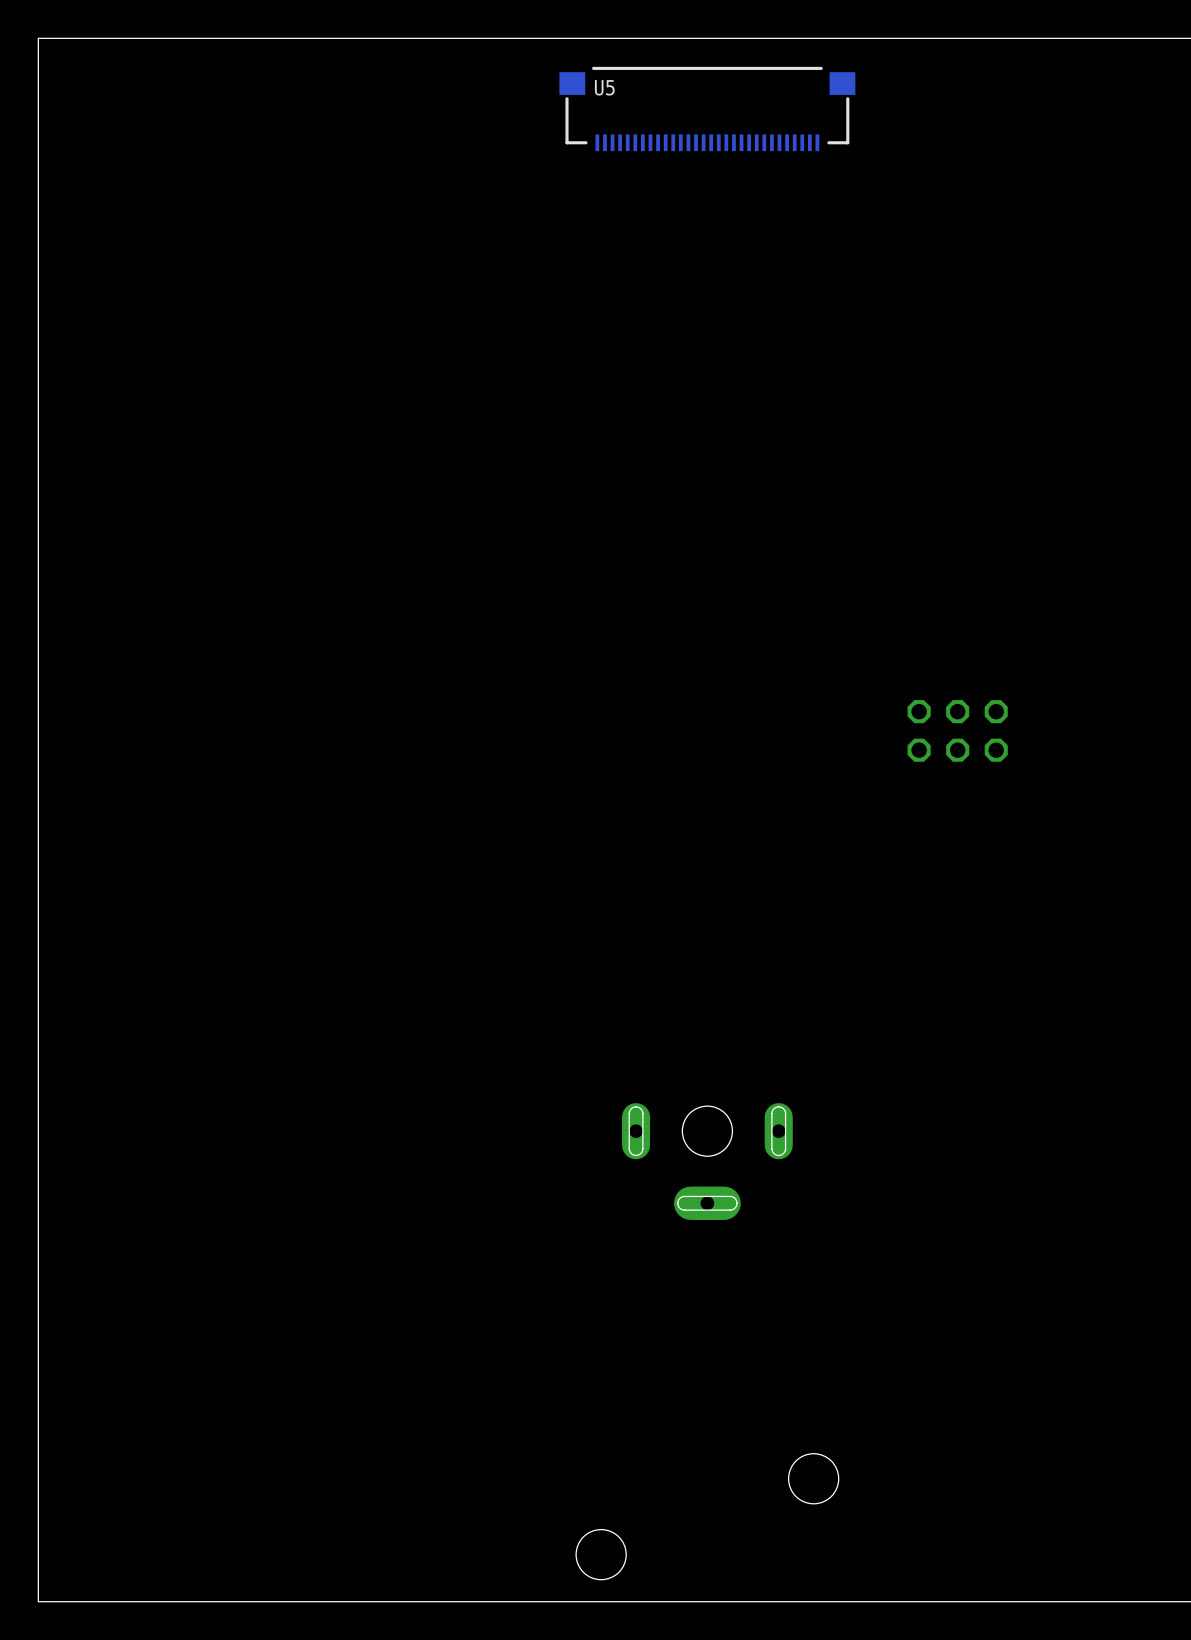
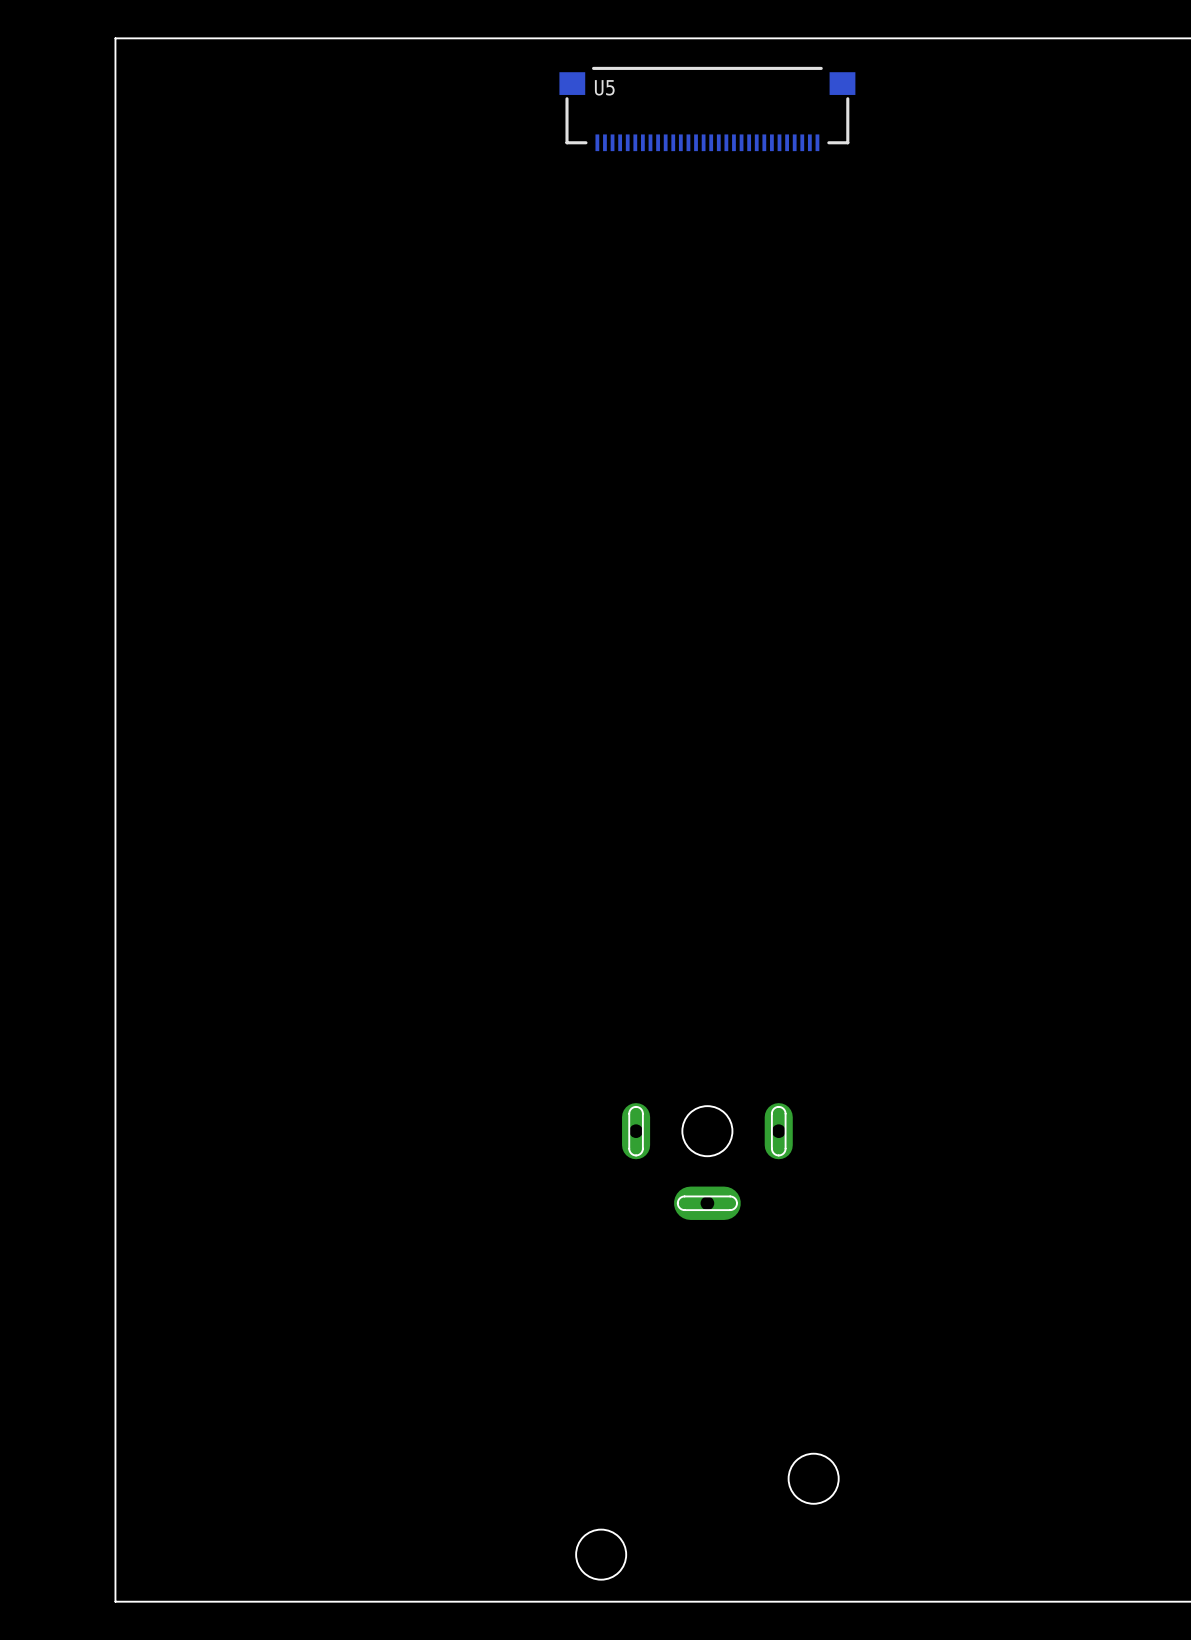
board edge: (115, 38) (38, 38) (38, 1601) (115, 1601) -> (115, 38) (115, 1601)
part: (957, 730) -> none

